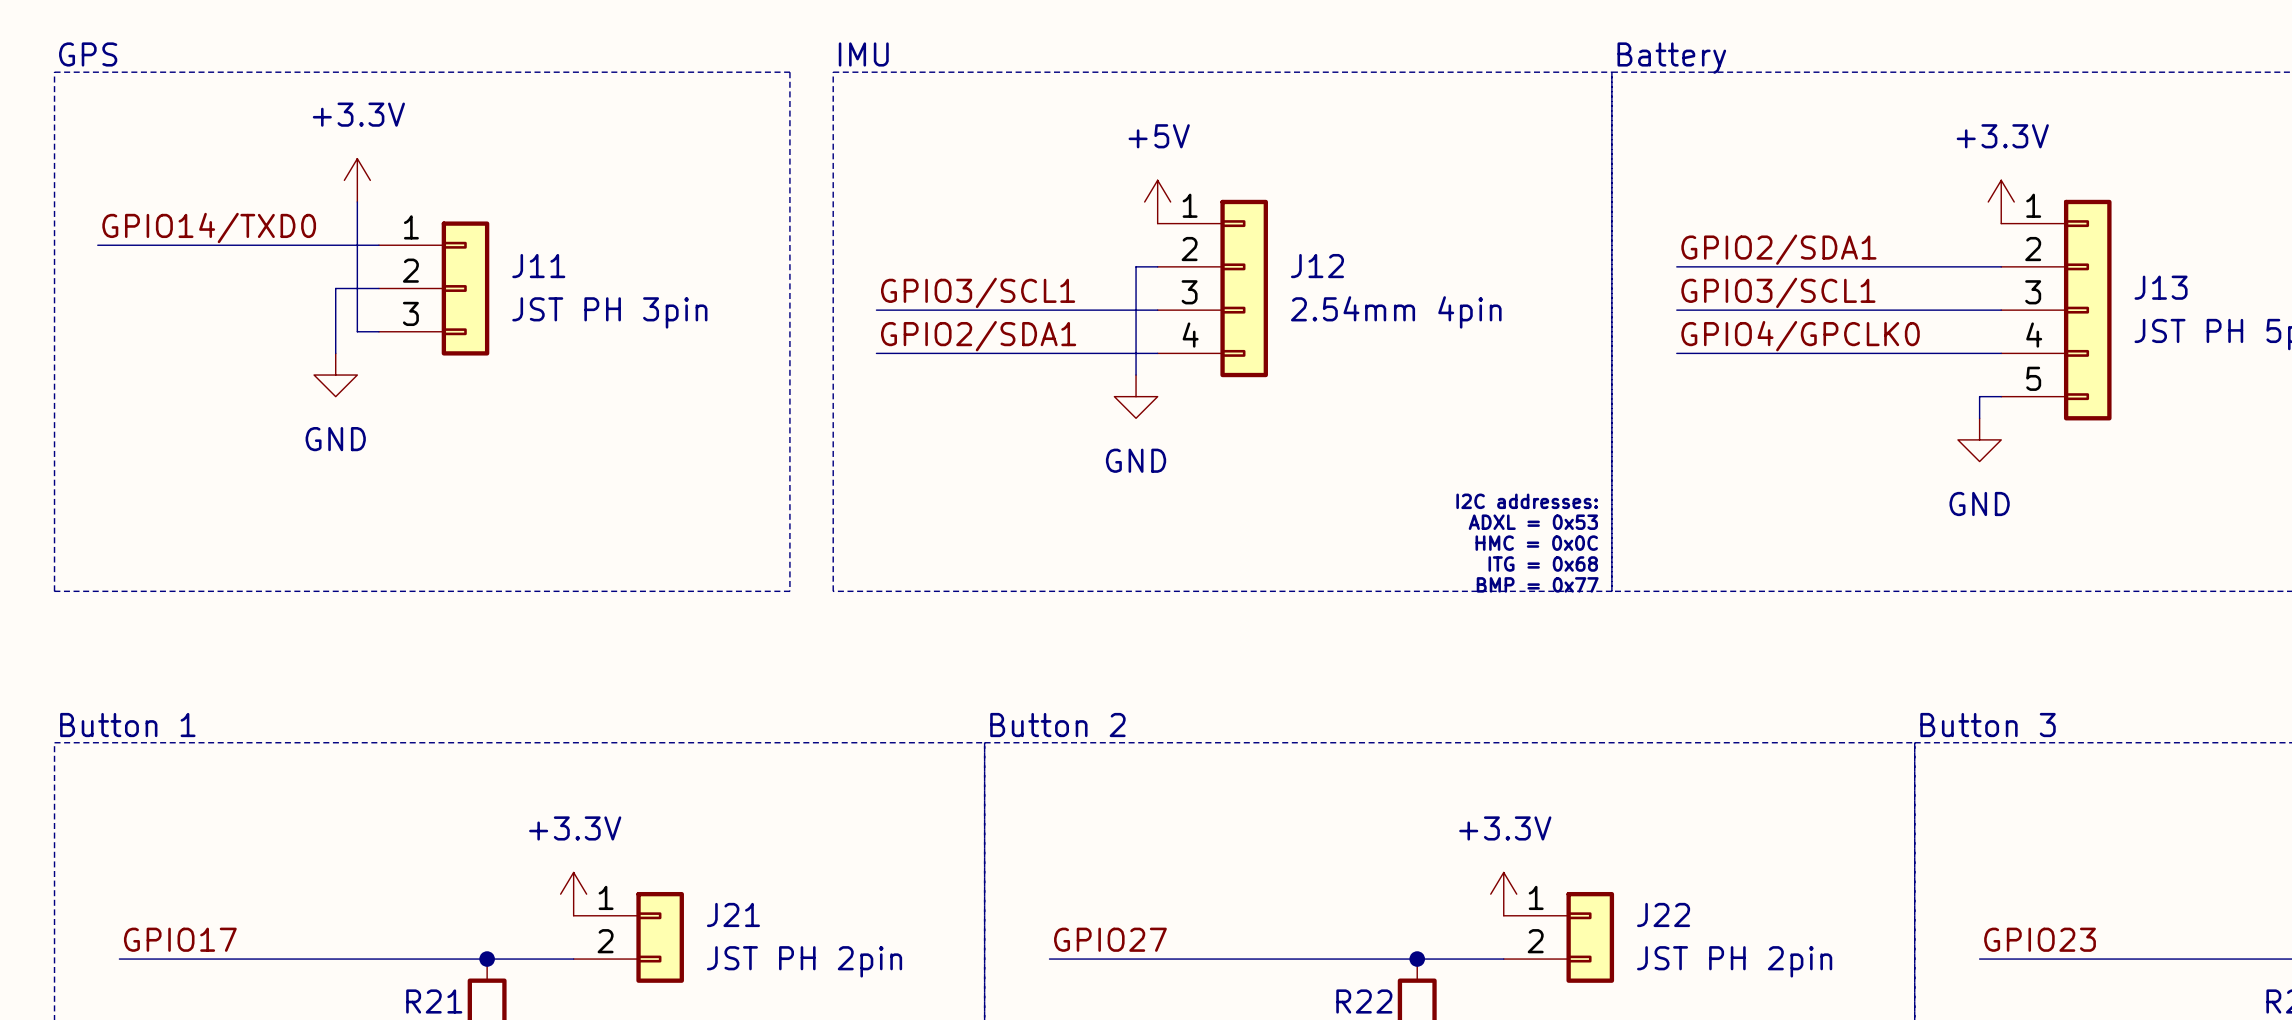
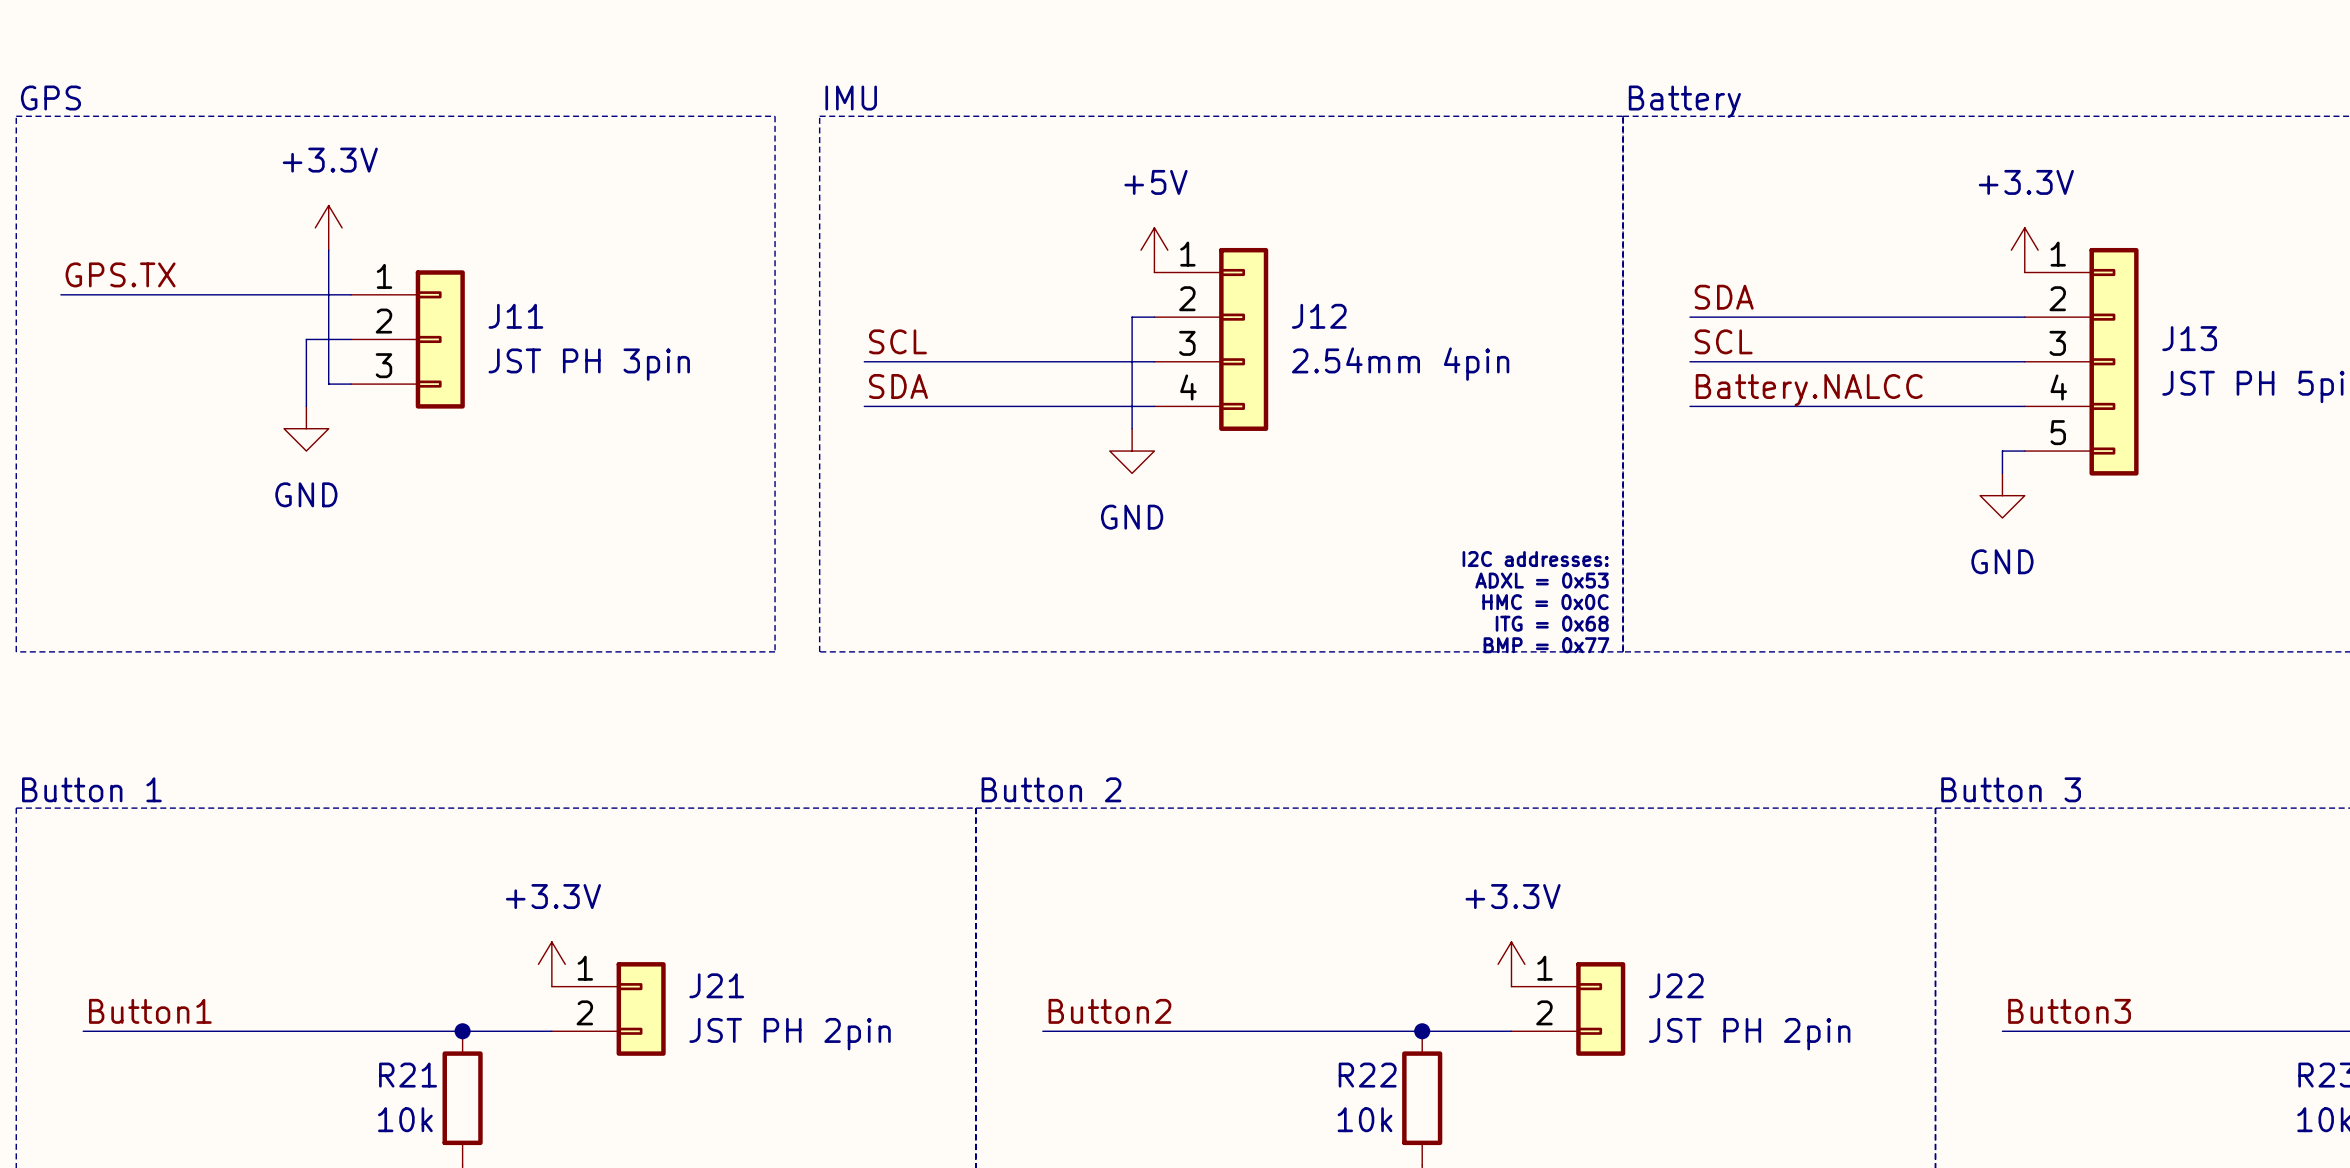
label: GPIO14/TXD0 (209, 228) -> GPS.TX (120, 274)
label: GPIO2/SDA1 (1778, 249) -> SDA (1724, 297)
label: GPIO3/SCL1 (978, 292) -> SCL (897, 341)
label: GPIO3/SCL1 (1778, 292) -> SCL (1723, 341)
label: GPIO2/SDA1 (978, 336) -> SDA (898, 386)
label: GPIO4/GPCLK0 (1800, 336) -> Battery.NALCC (1809, 390)
label: GPIO17 (180, 939) -> Button1 (150, 1011)
label: GPIO27 (1110, 939) -> Button2 (1109, 1011)
label: GPIO23 (2040, 939) -> Button3 (2069, 1011)

